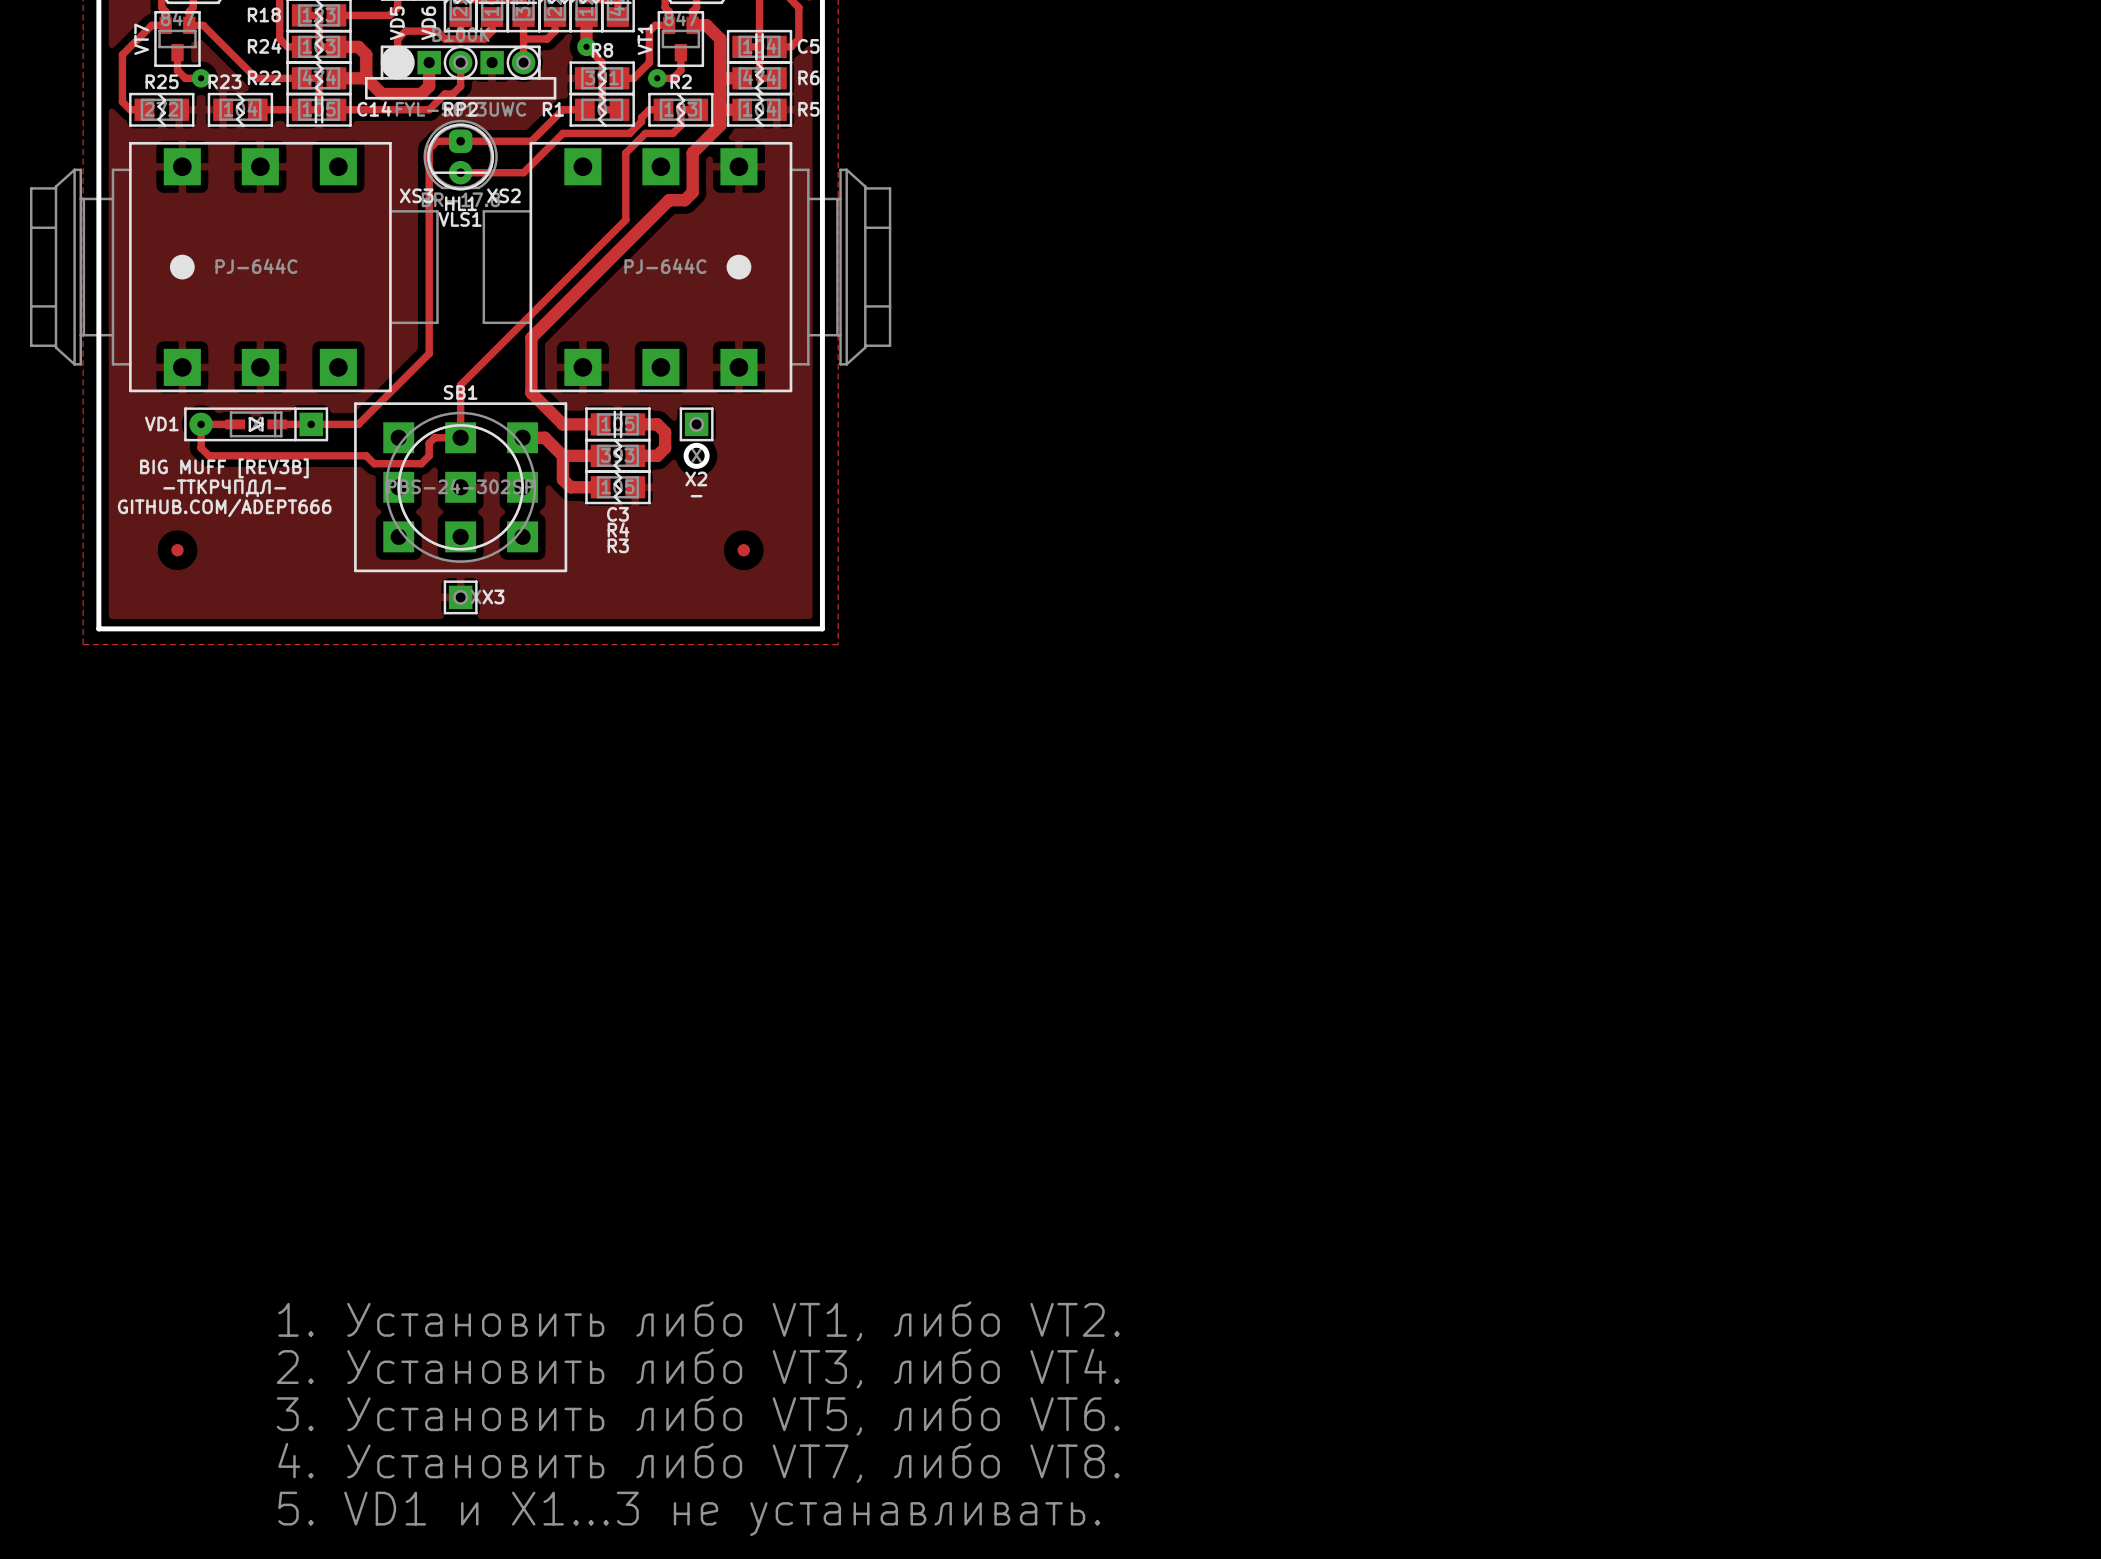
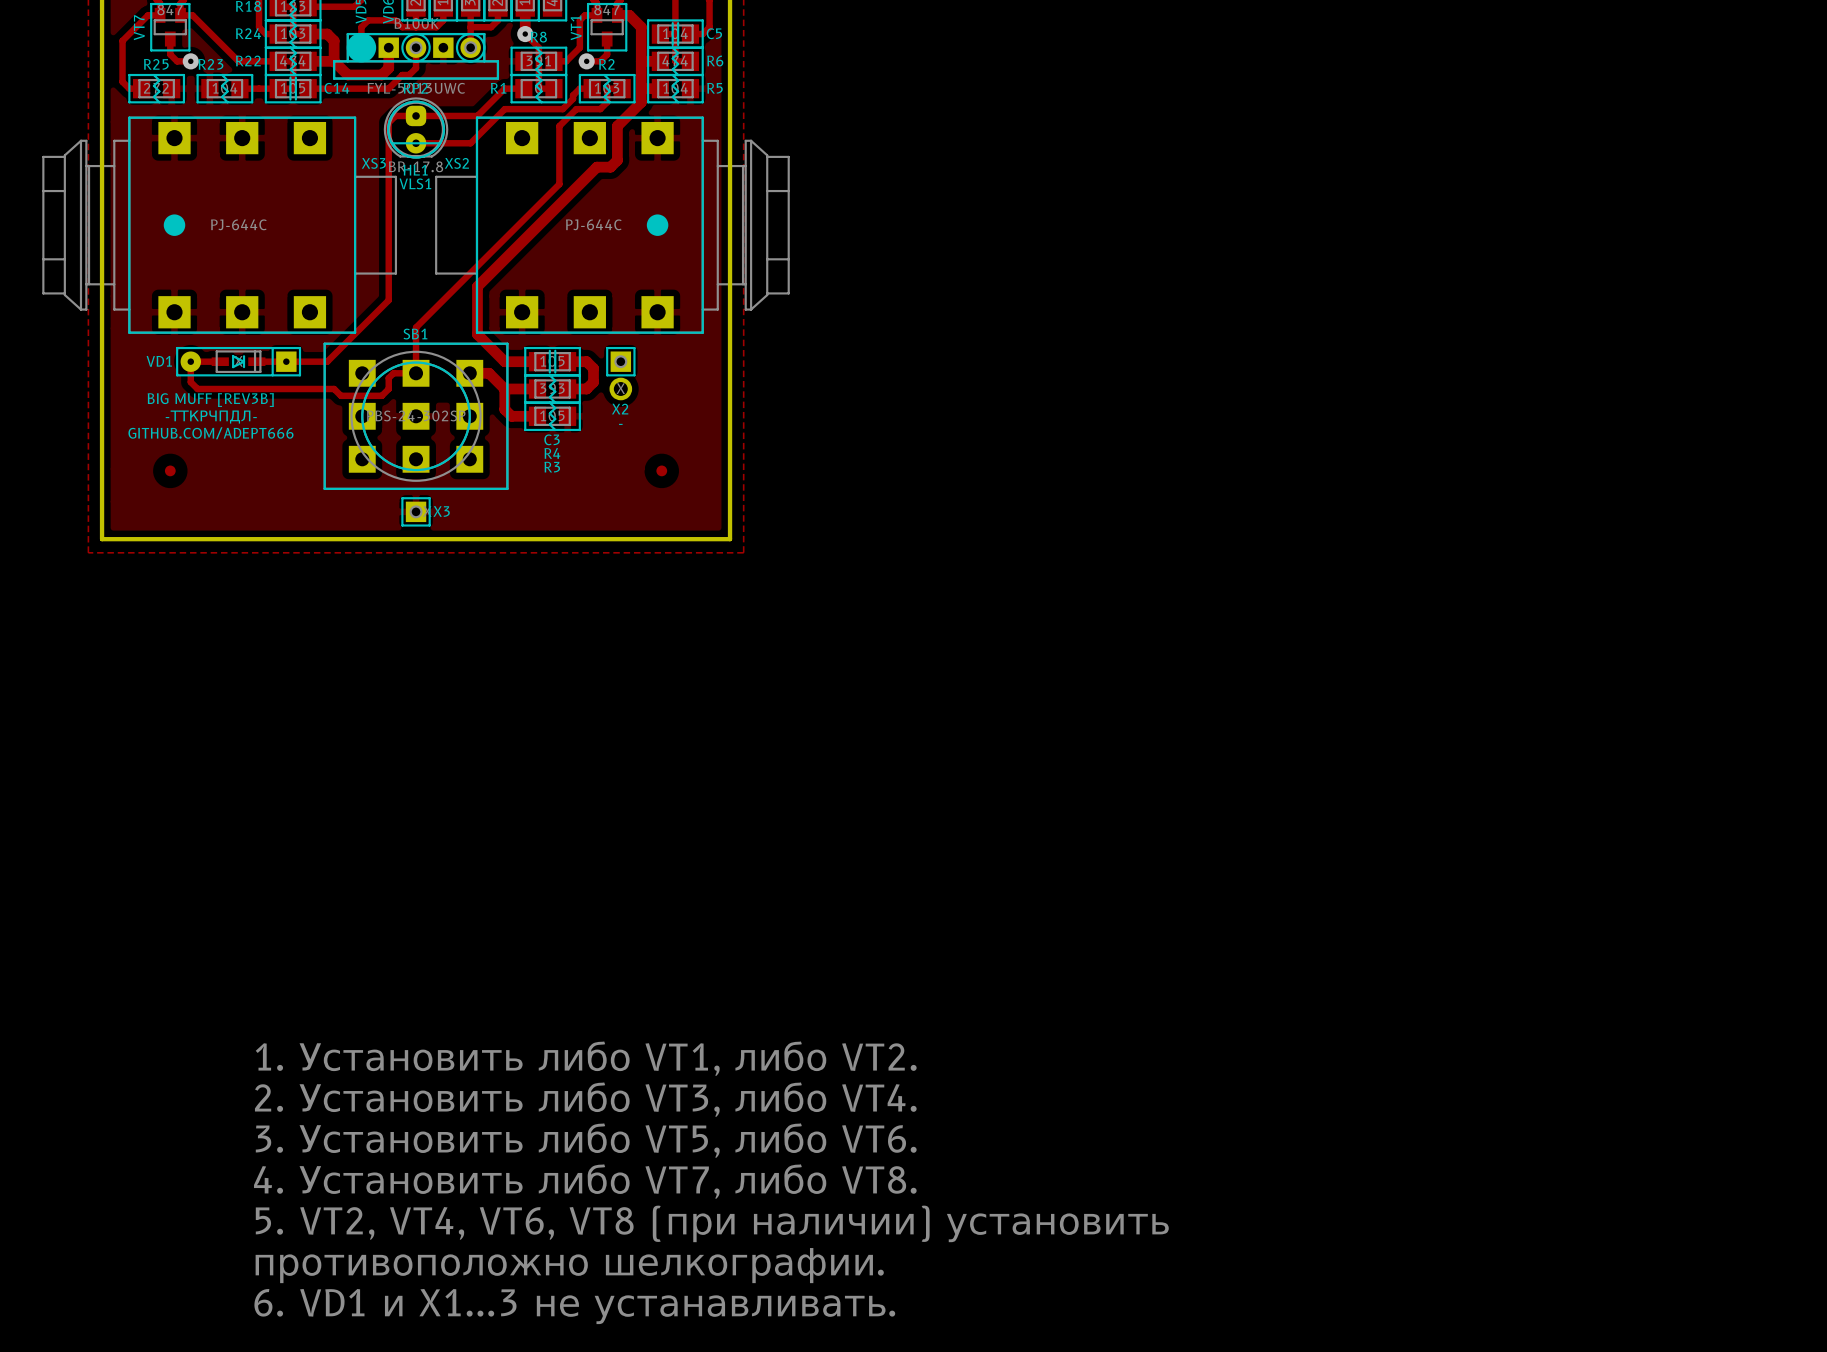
text: none -> 1. Установить либо VT1, либо VT2. (586, 1058)
text: none -> 2. Установить либо VT3, либо VT4. (585, 1099)
text: 1. Установить либо VT1, либо VT2. (698, 1321) -> 3. Установить либо VT5, либо VT6. (586, 1140)
text: 2. Установить либо VT3, либо VT4. (698, 1368) -> 4. Установить либо VT7, либо VT8. (585, 1181)
text: 3. Установить либо VT5, либо VT6. (698, 1415) -> 5. VT2, VT4, VT6, VT8 (при наличии) установить (712, 1223)
text: 4. Установить либо VT7, либо VT8. (698, 1462) -> противоположно шелкографии. (569, 1265)
text: 5. VD1 и X1...3 не устанавливать. (689, 1513) -> 6. VD1 и X1...3 не устанавливать. (574, 1306)

